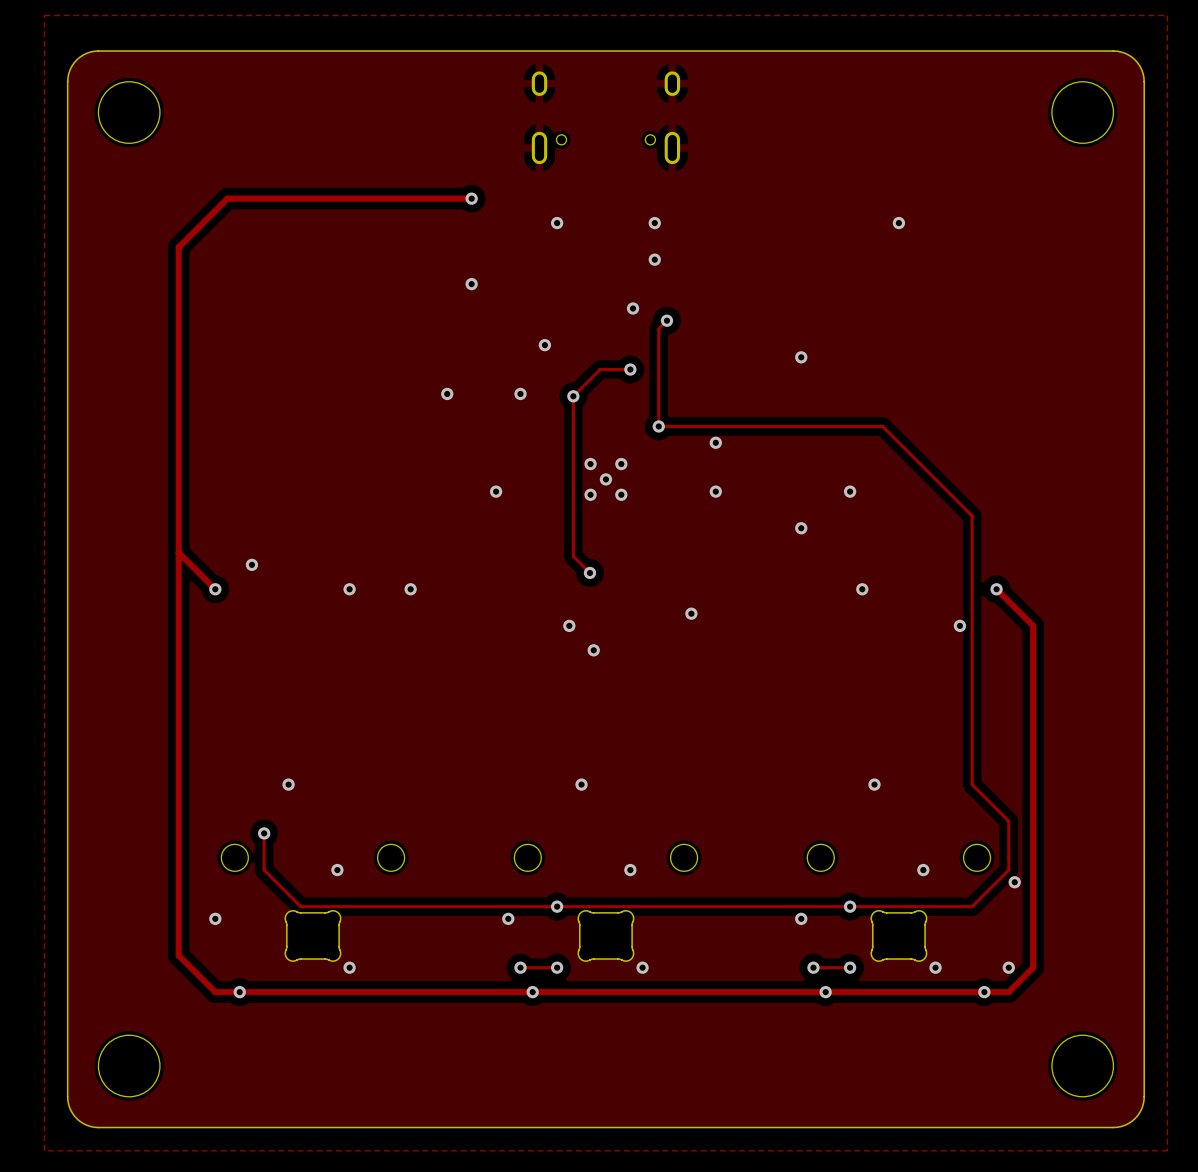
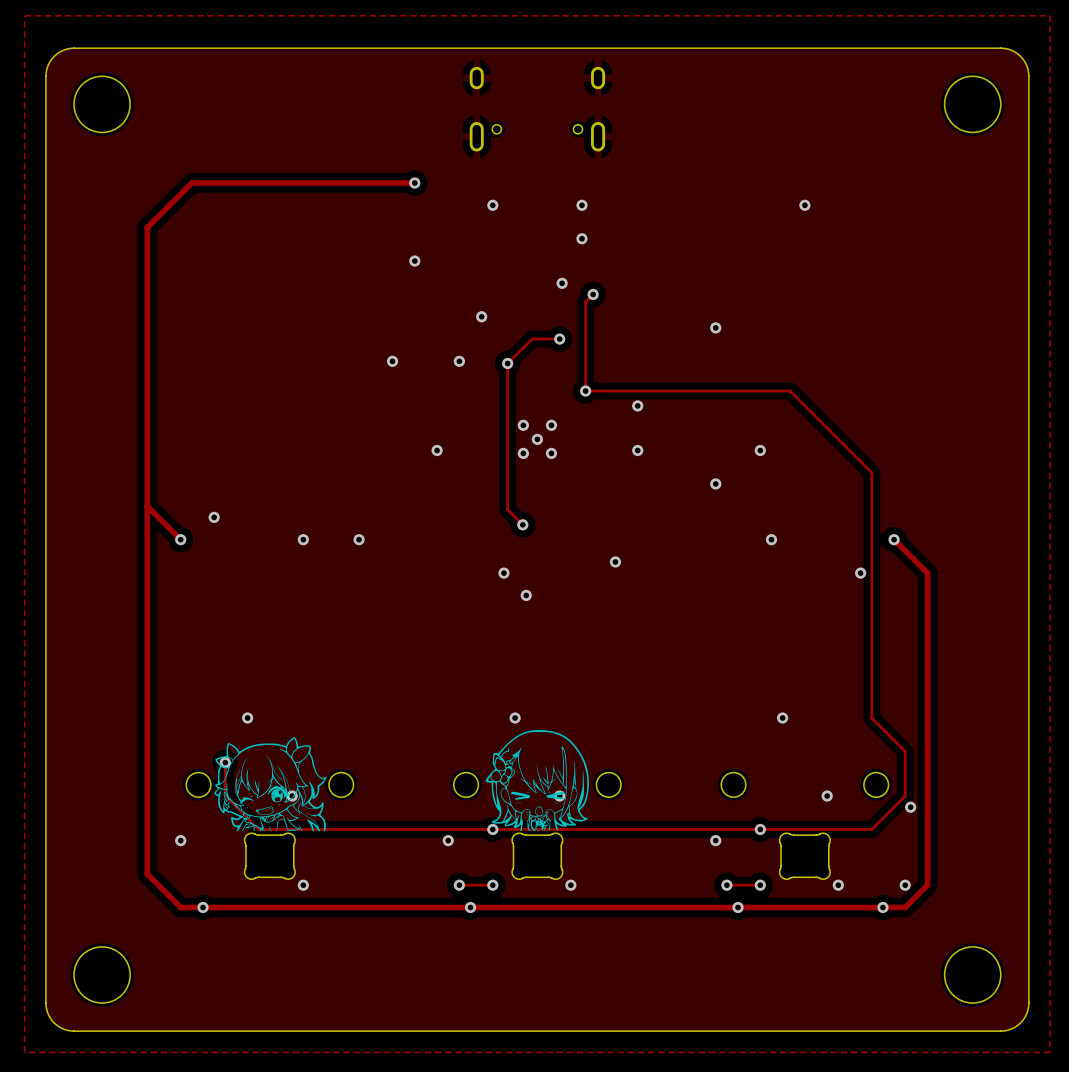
drawing: none -> [485, 729, 589, 832]
drawing: none -> [214, 737, 327, 832]

